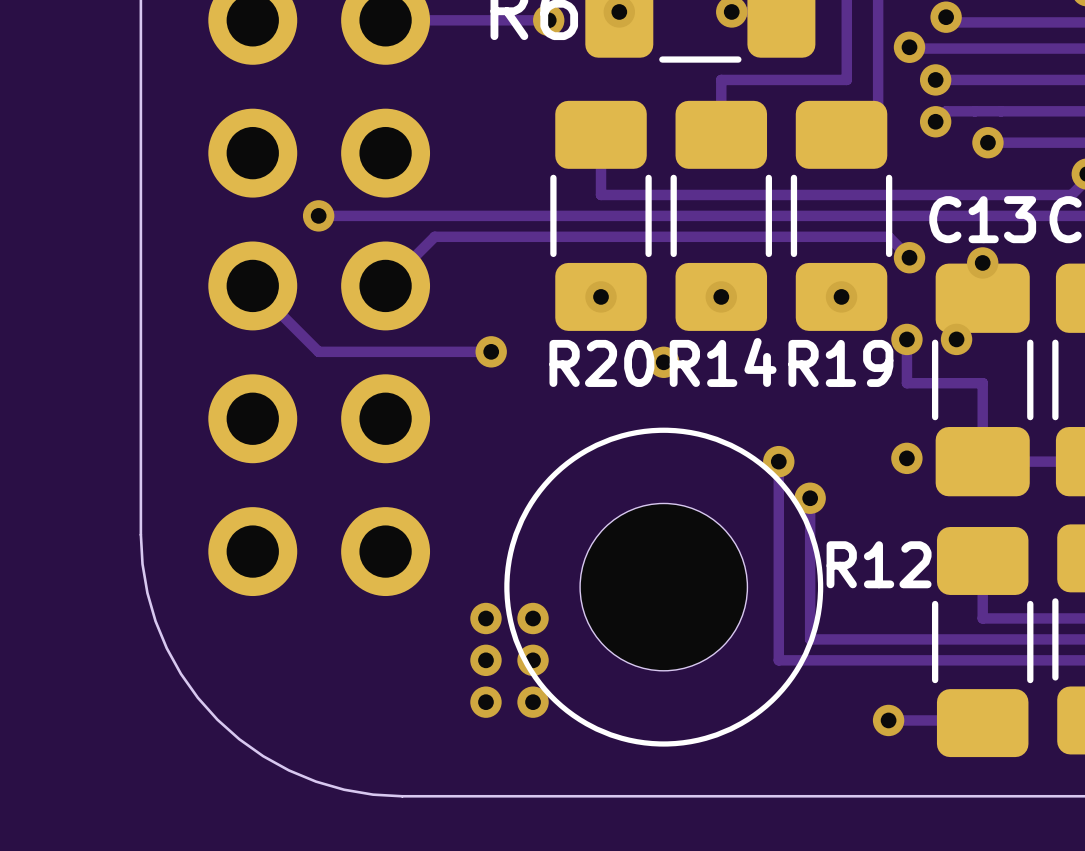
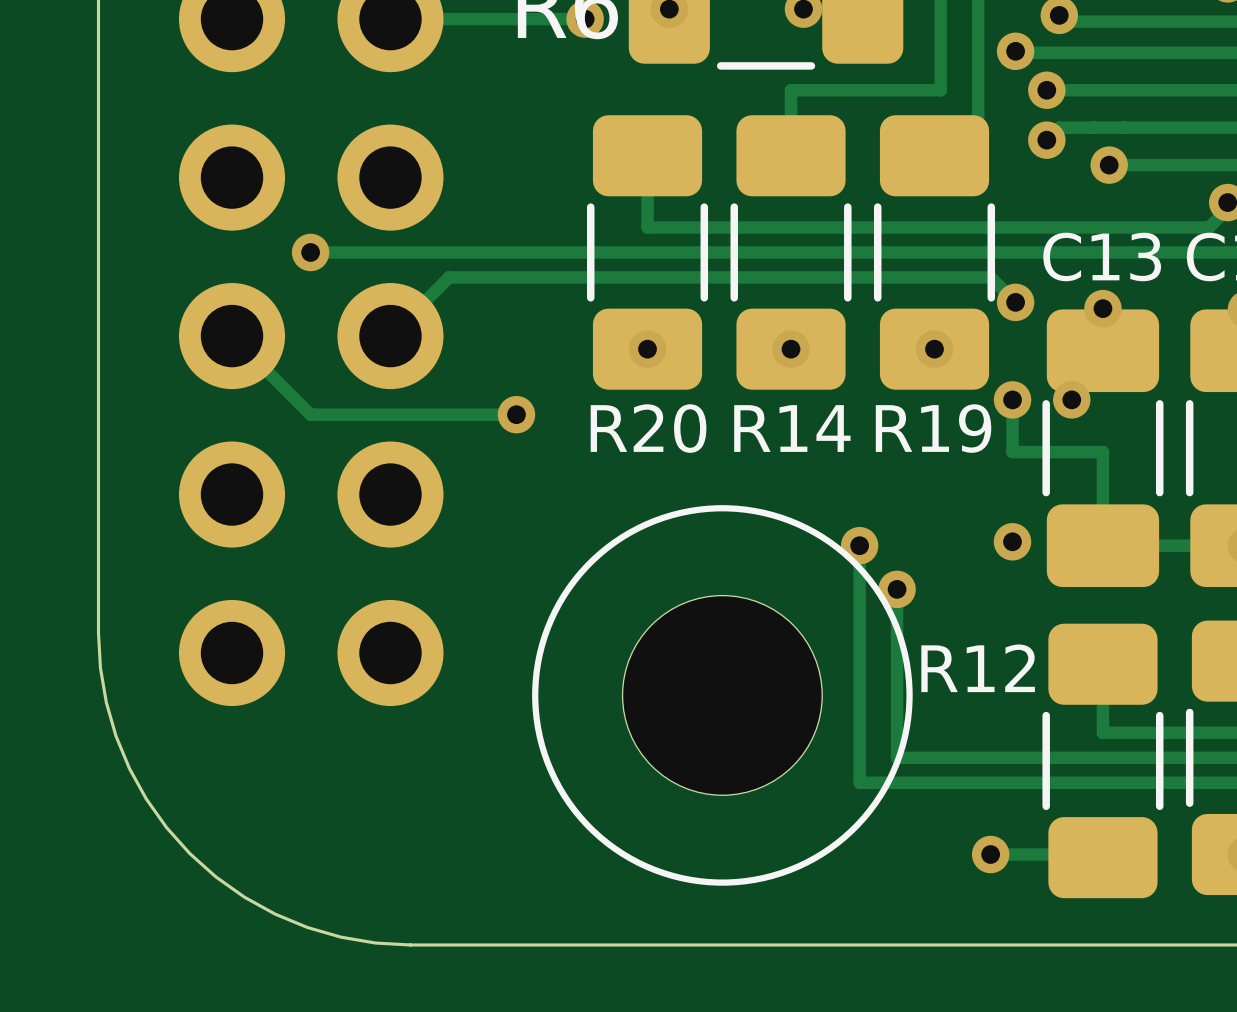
via: (663, 362) -> none
via: (485, 618) -> none
via: (533, 618) -> none
via: (485, 660) -> none
via: (533, 660) -> none
via: (485, 702) -> none
via: (533, 702) -> none

